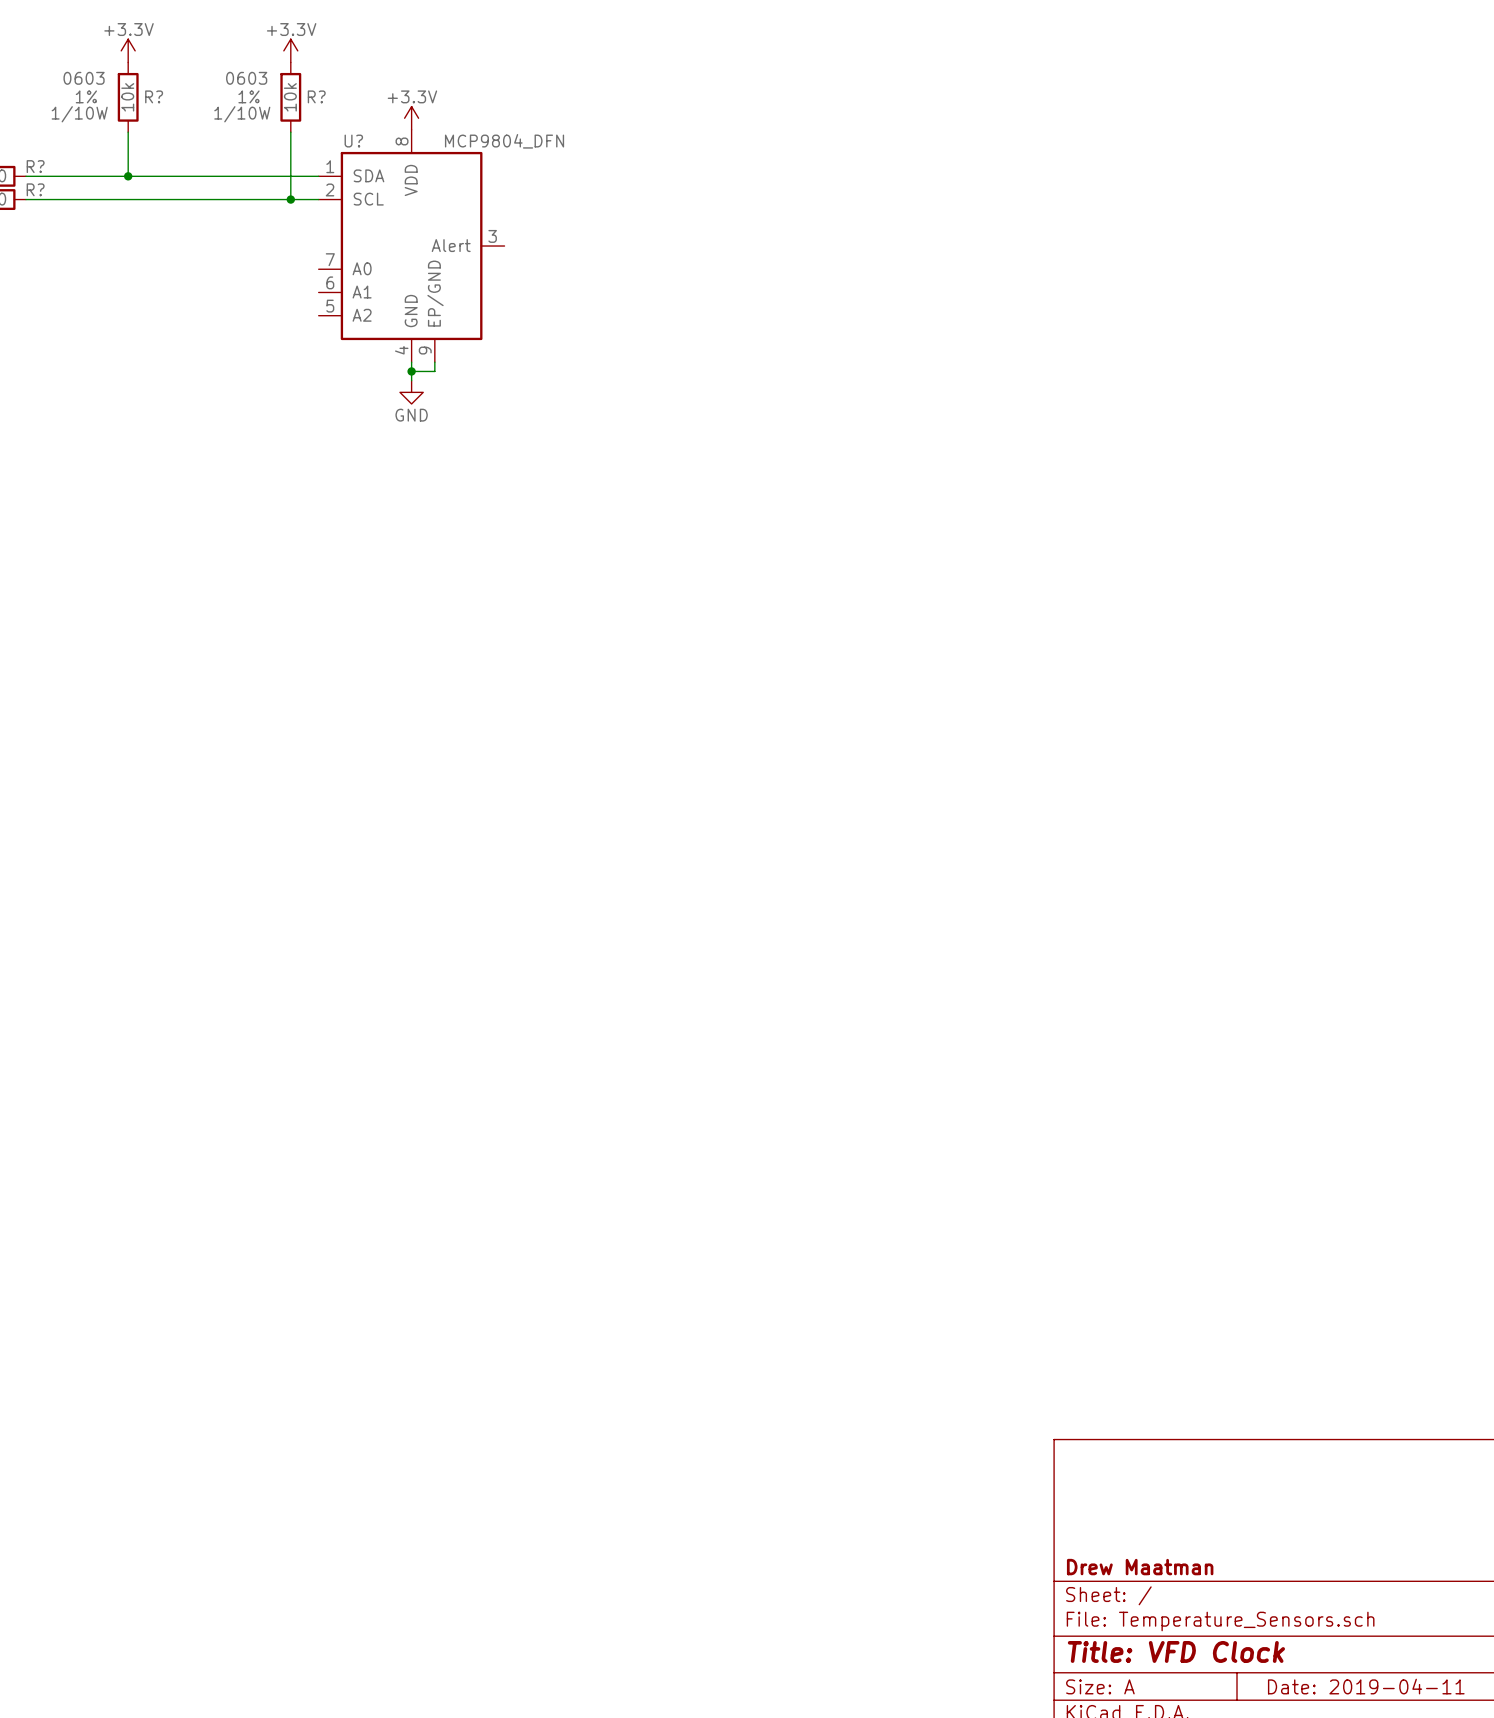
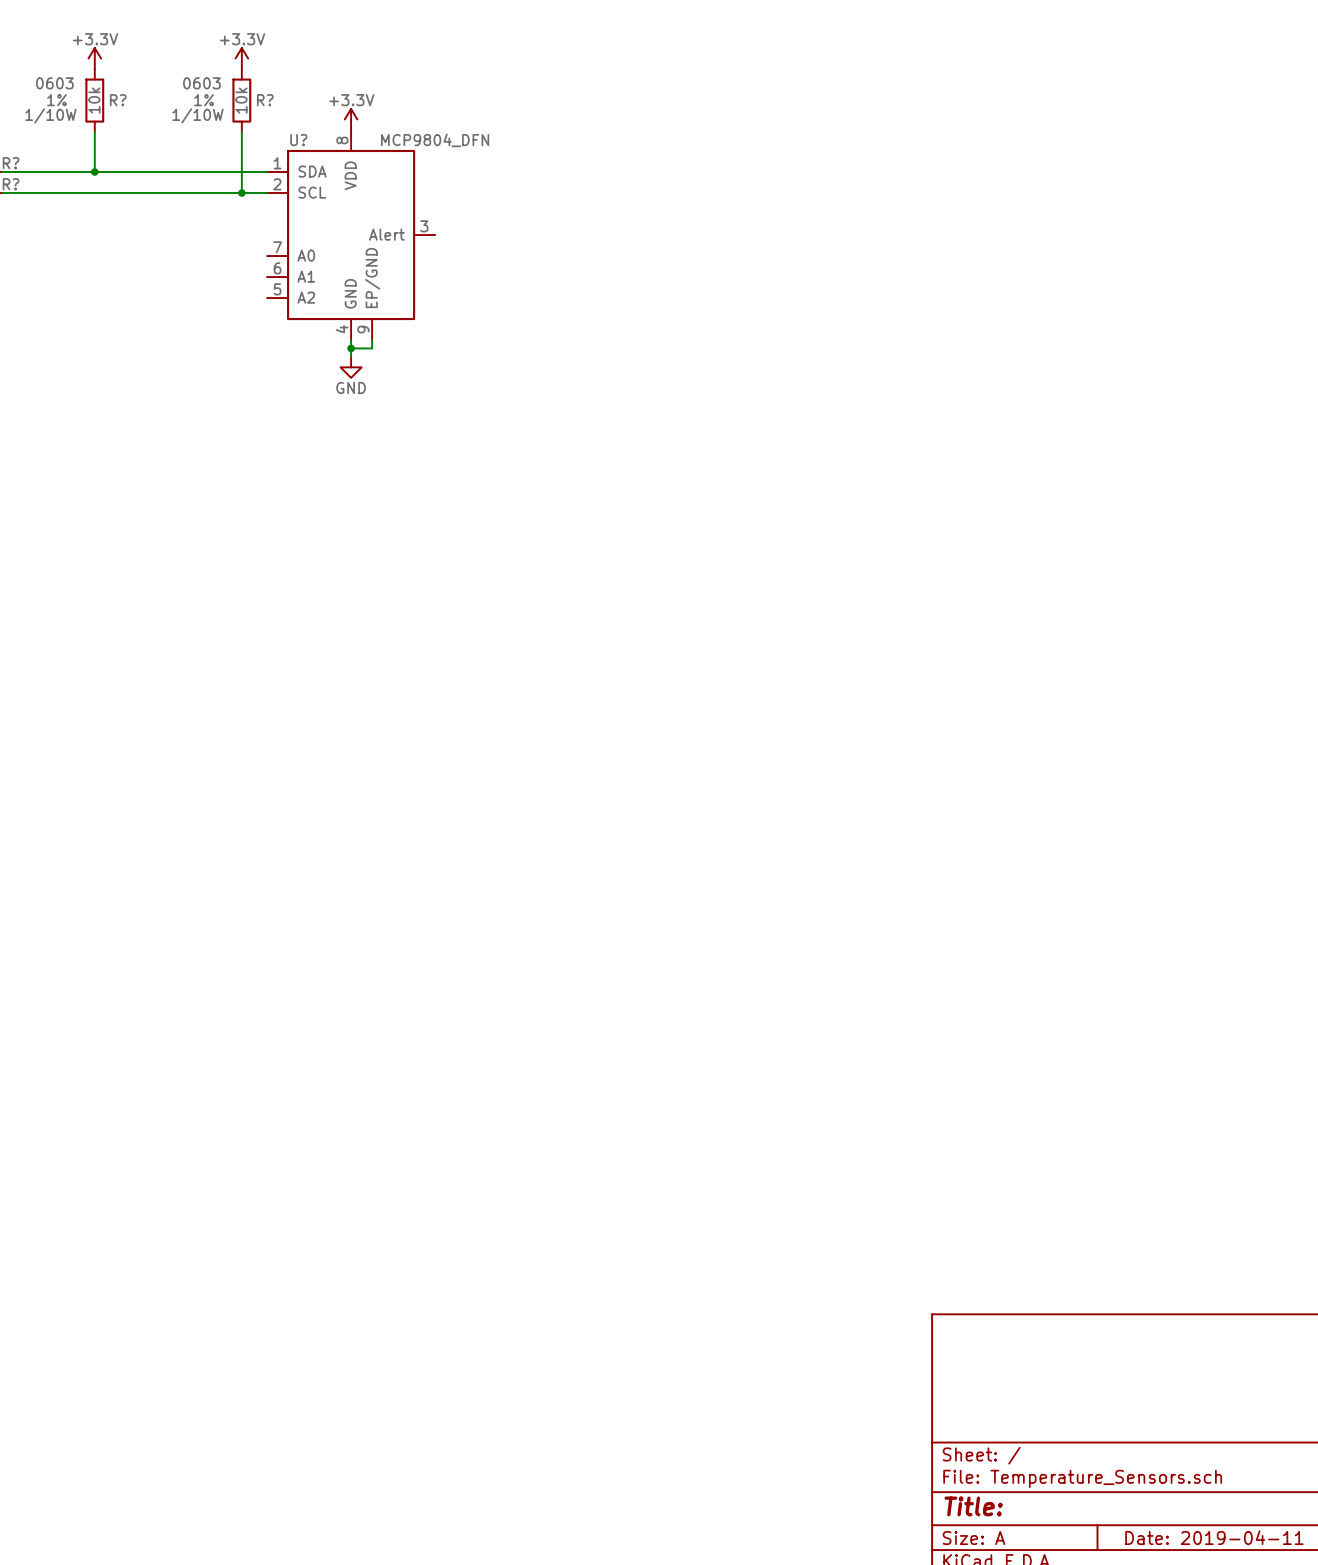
title block: Drew Maatman (1140, 1567) -> none
title block: Title: VFD Clock (1176, 1651) -> Title: (973, 1506)

